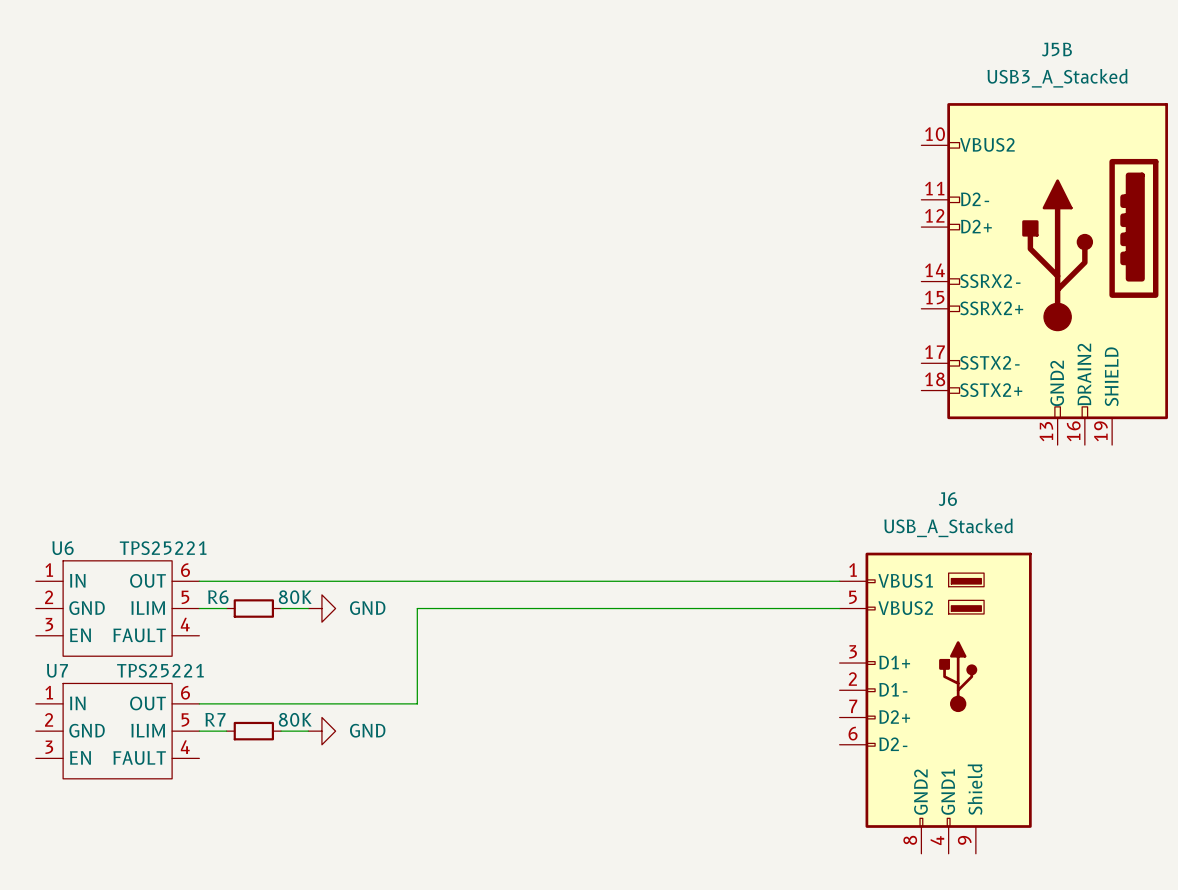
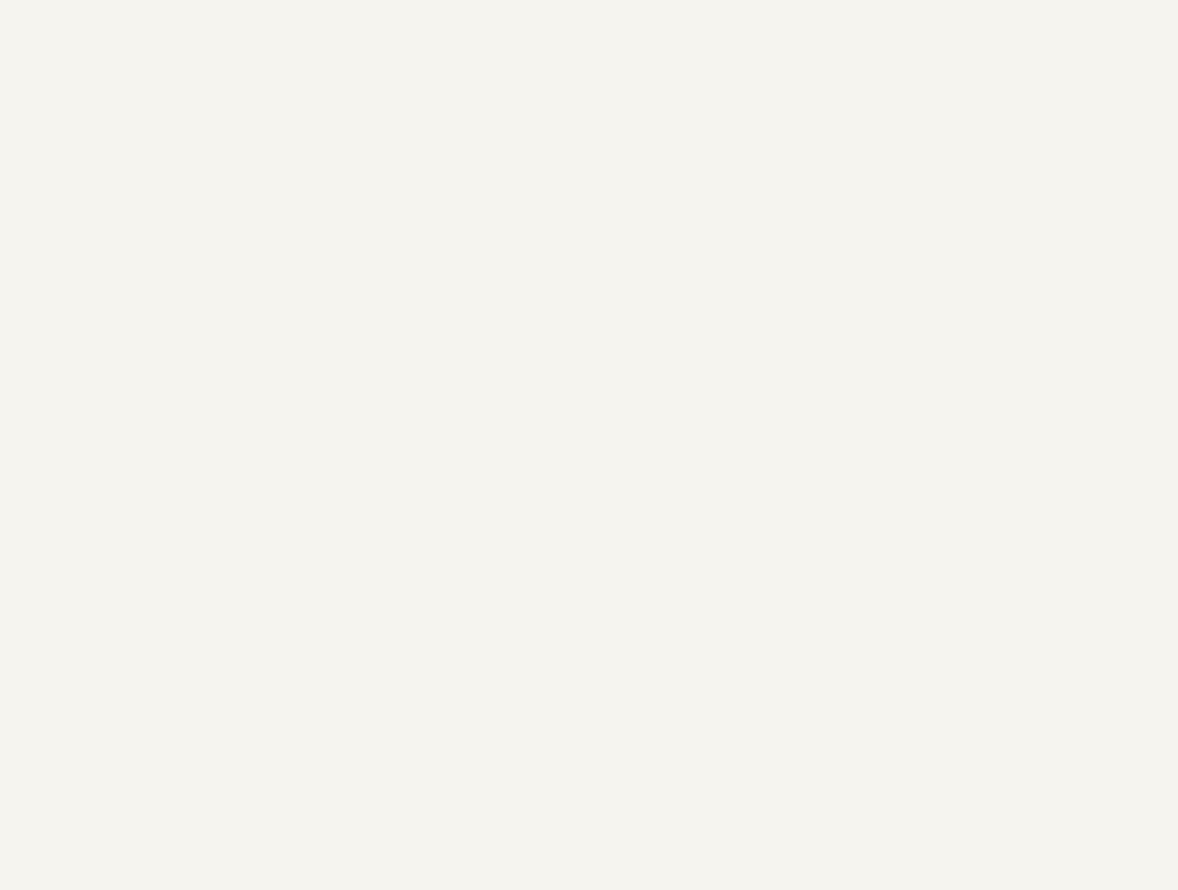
J5B: USB3_A_Stacked (1044, 274) -> none
wire: (199, 581) (839, 581) -> none
U6: TPS25221 (117, 608) -> none
wire: (199, 608) (226, 608) -> none
R6: 80K (253, 608) -> none
wire: (281, 608) (308, 608) -> none
power symbol: GND (321, 608) -> none
wire: (839, 608) (417, 608) (417, 703) (199, 703) -> none
J6: USB_A_Stacked (935, 703) -> none
U7: TPS25221 (117, 731) -> none
wire: (199, 731) (226, 731) -> none
R7: 80K (253, 731) -> none
wire: (281, 731) (308, 731) -> none
power symbol: GND (321, 731) -> none

